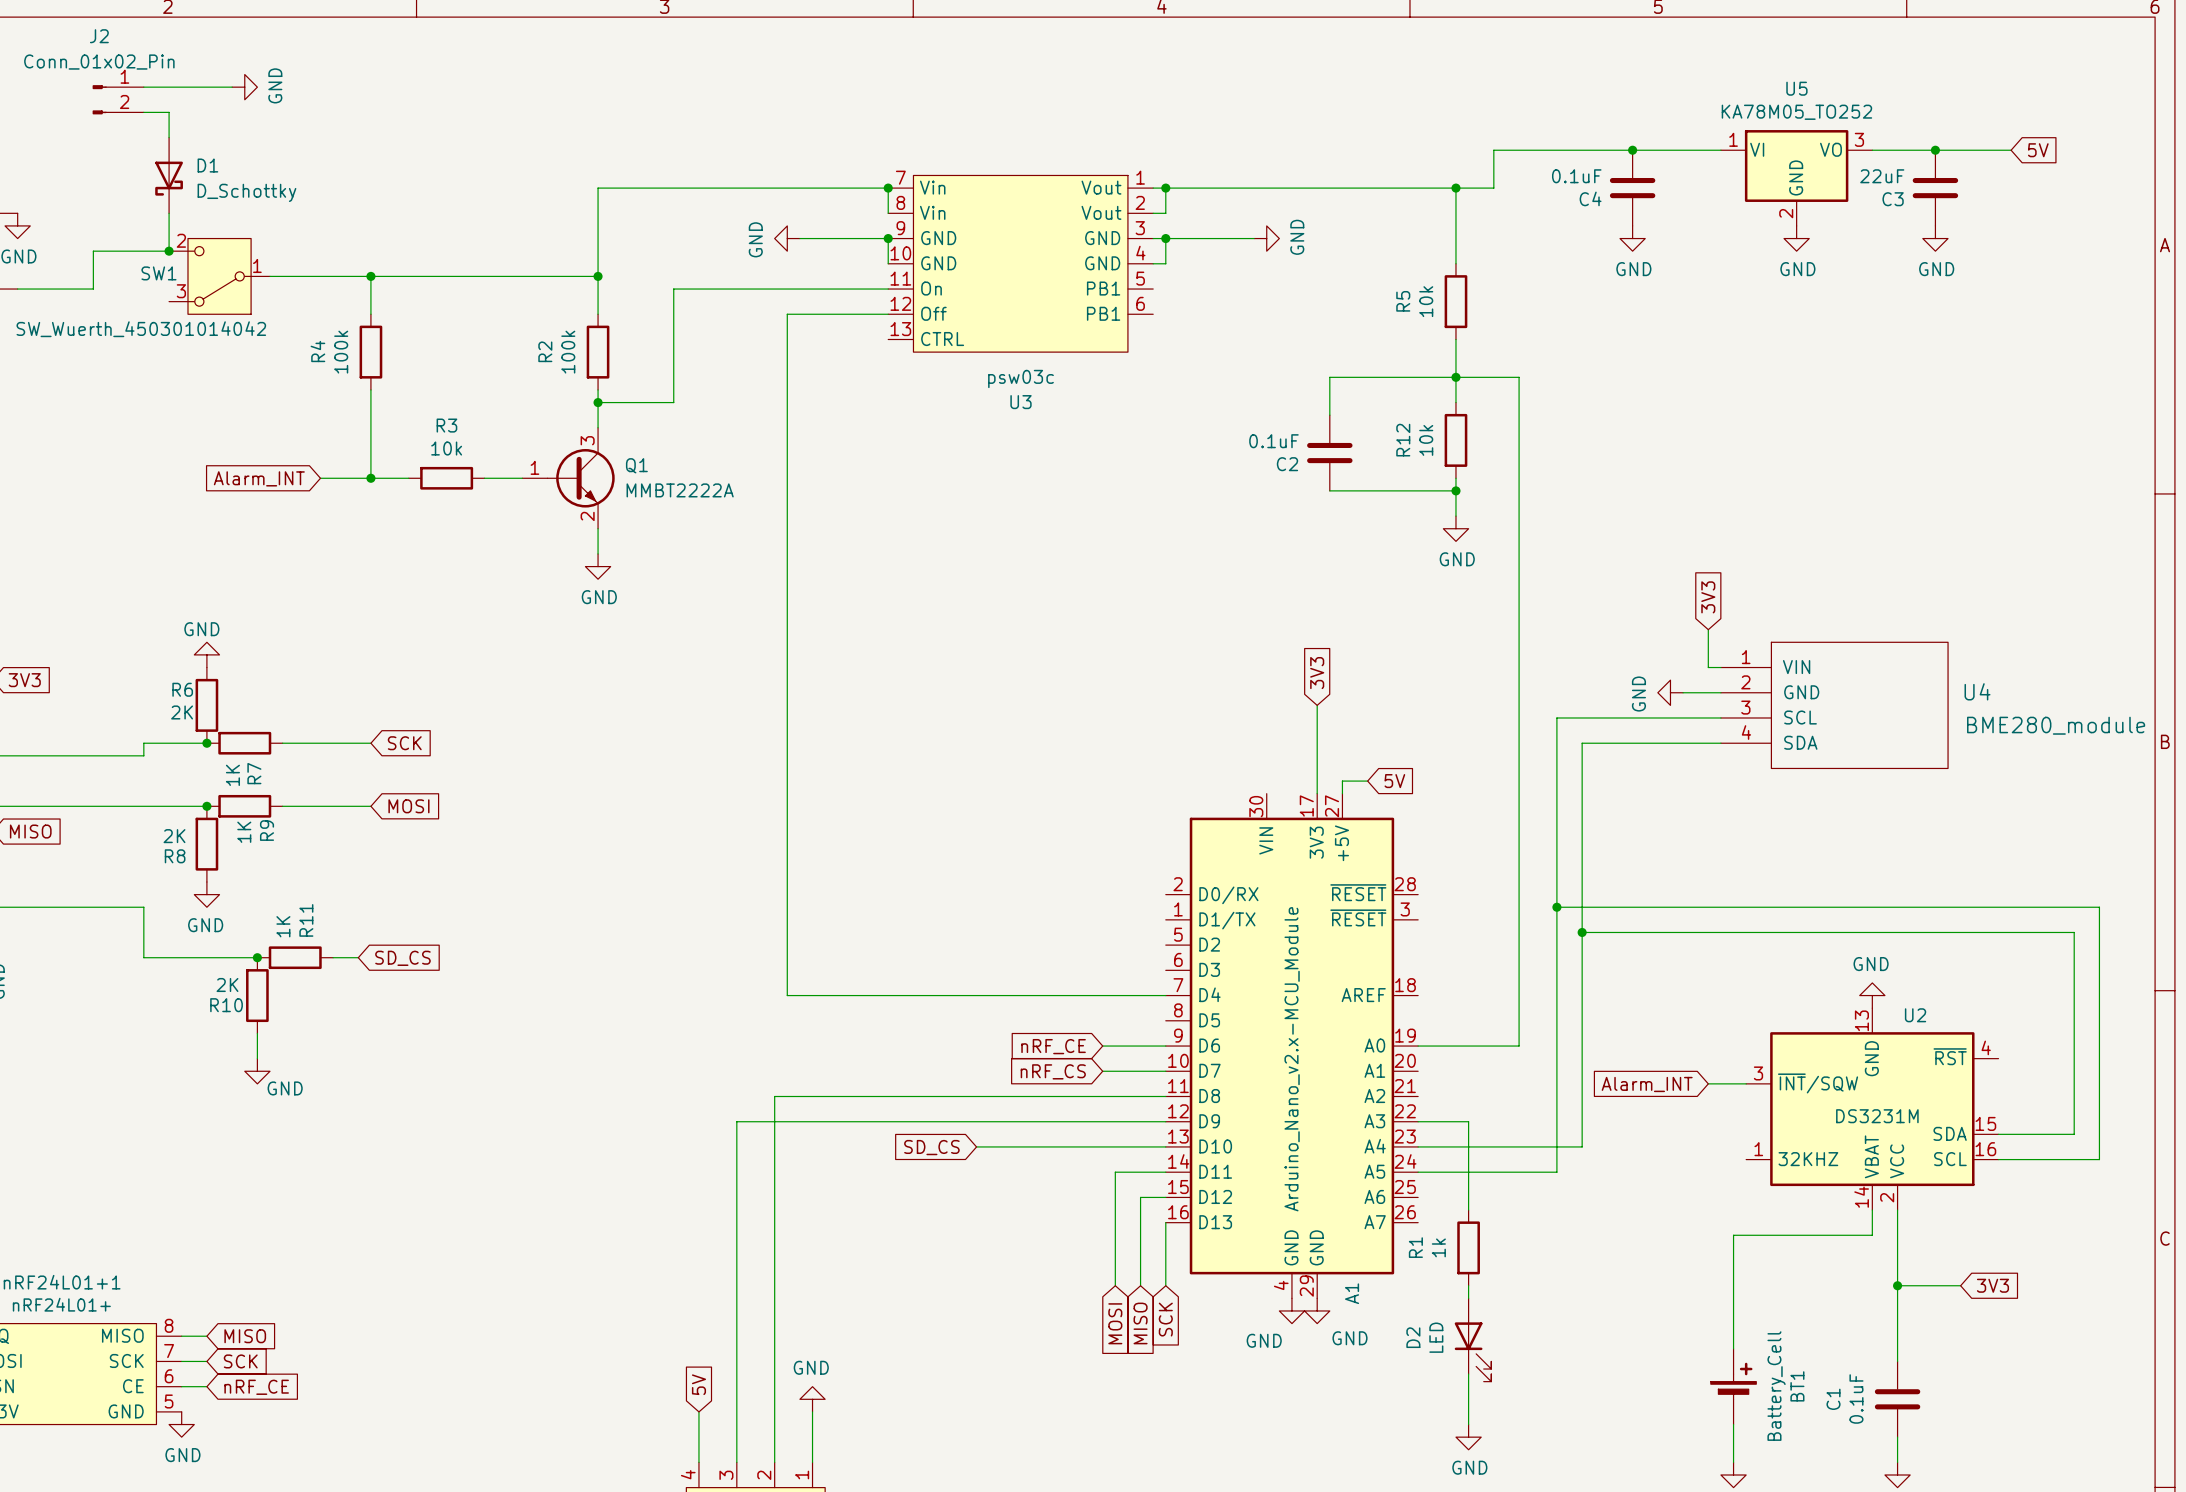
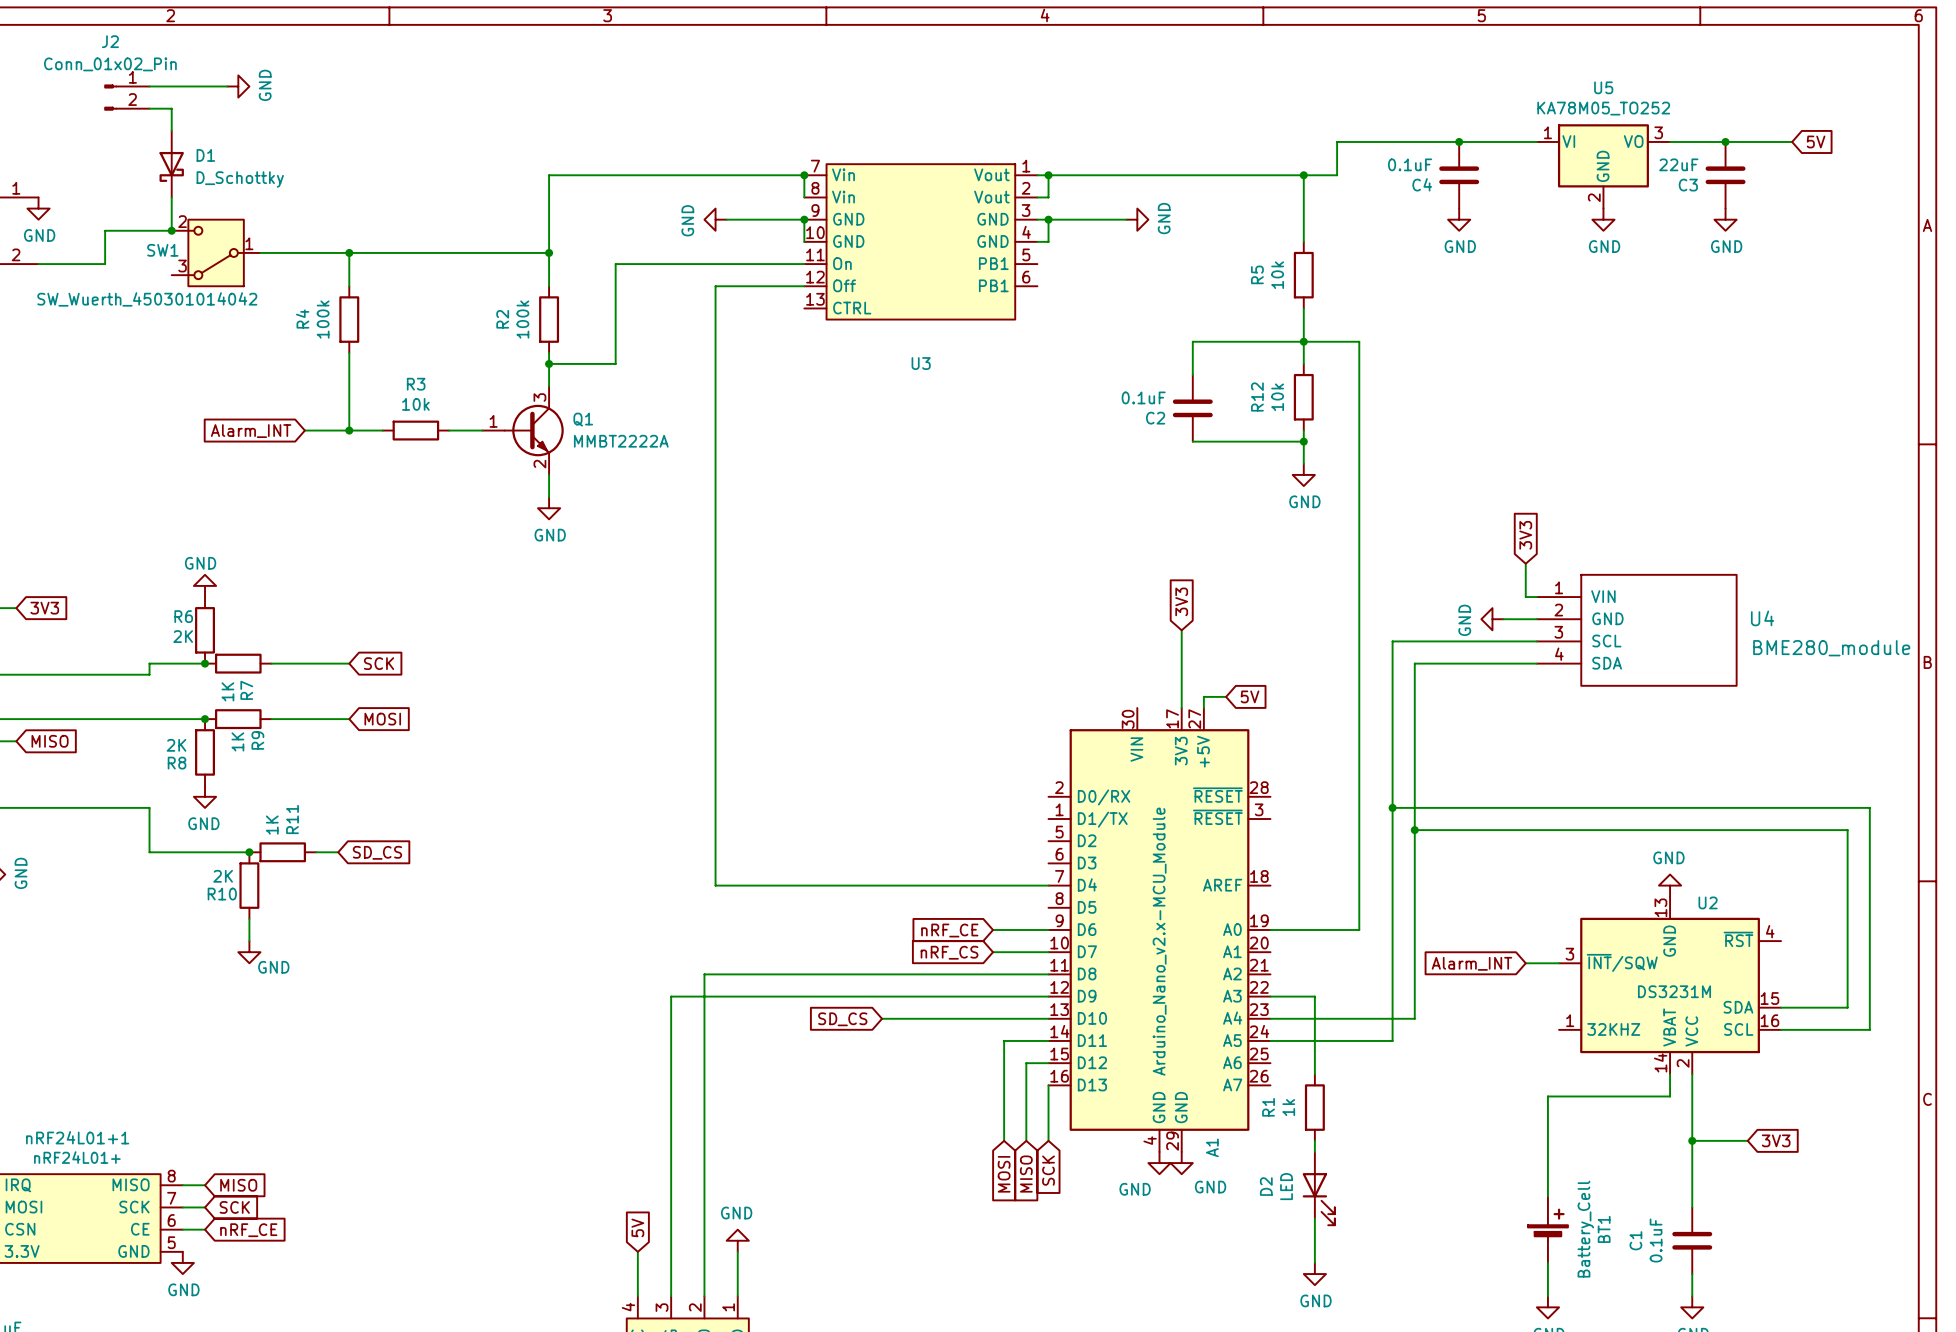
U3 value: psw03c (1021, 378) -> none

